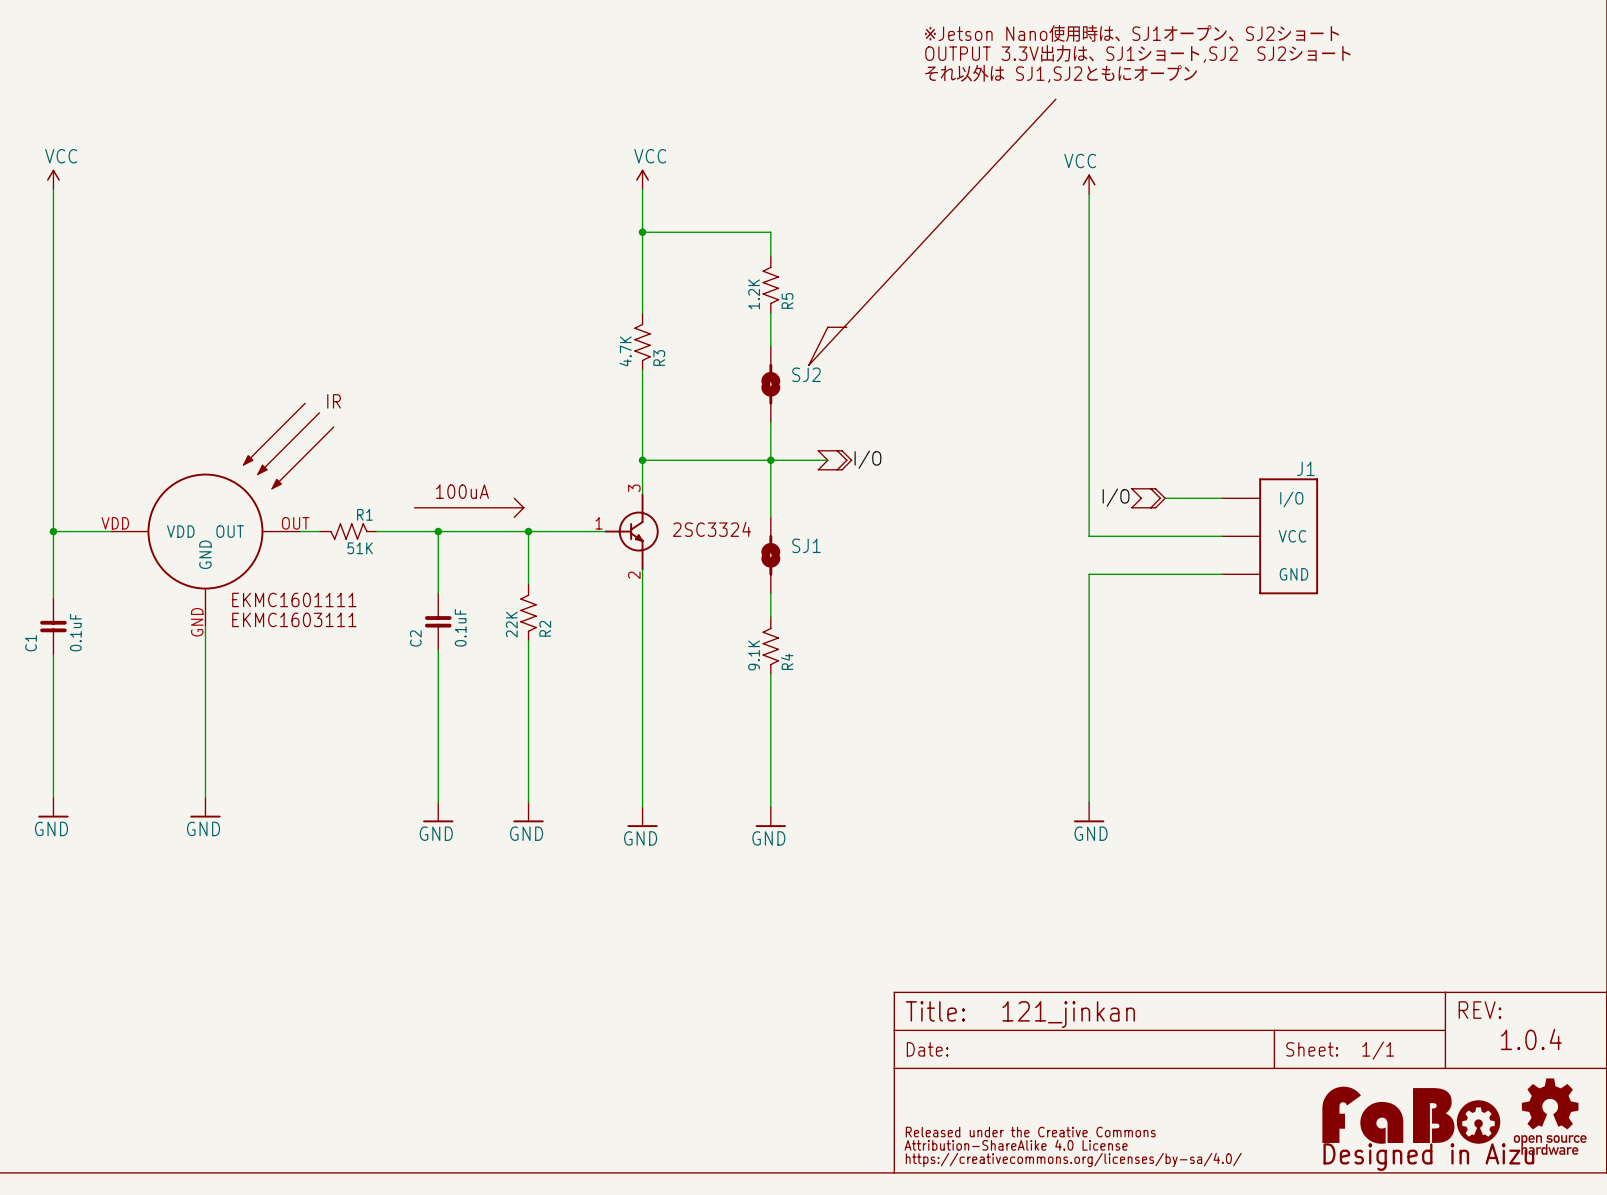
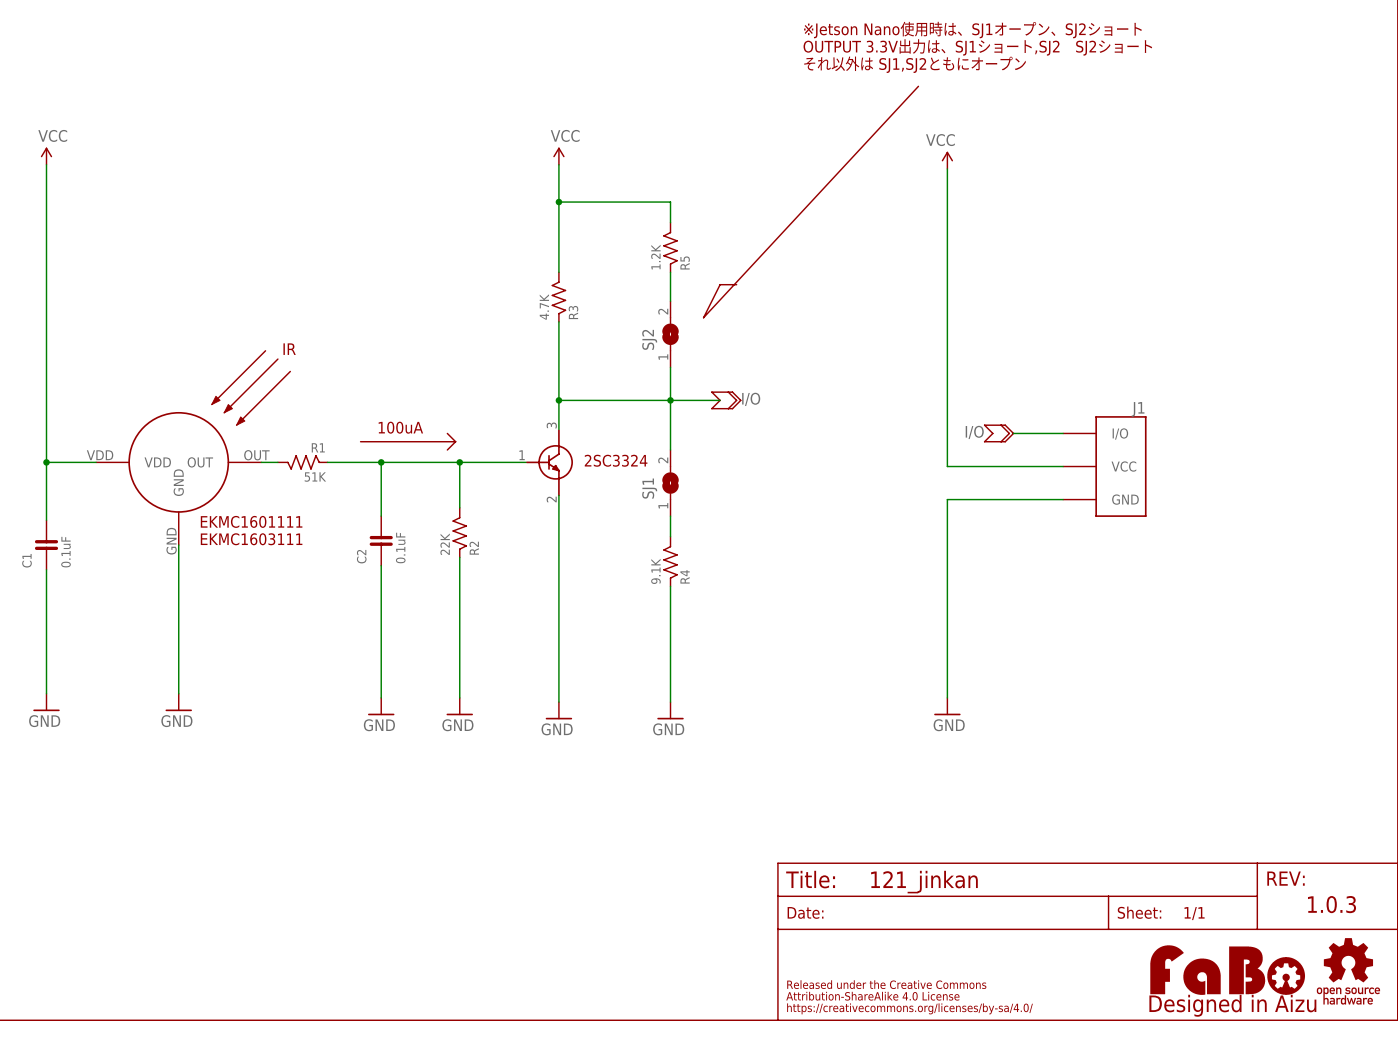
SJ2 symbol: [761, 346, 781, 423] -> [662, 301, 679, 368]
SJ2 name position: SJ2 (806, 374) -> SJ2 (649, 339)
SJ1 symbol: [761, 517, 781, 594] -> [662, 449, 679, 517]
SJ1 name position: SJ1 (806, 545) -> SJ1 (649, 488)
text: 1.0.4 (1531, 1039) -> 1.0.3 (1332, 904)

